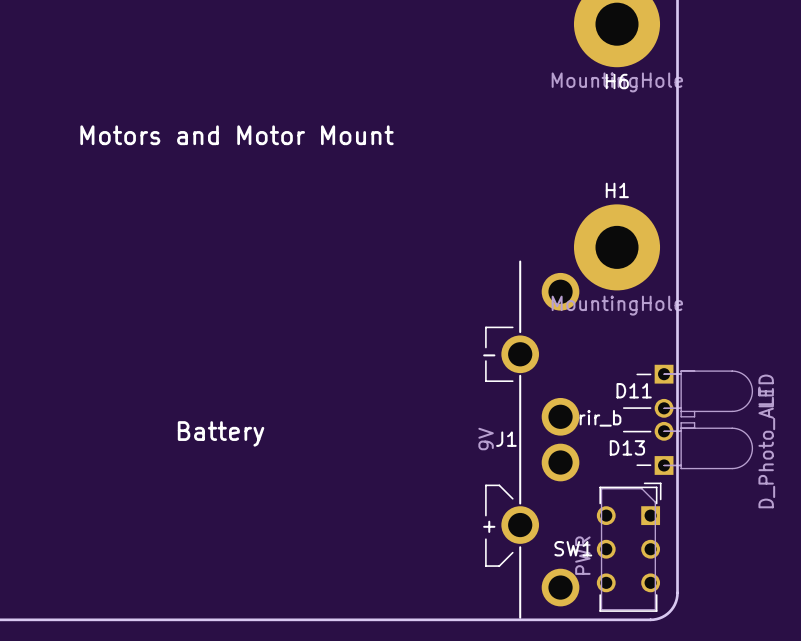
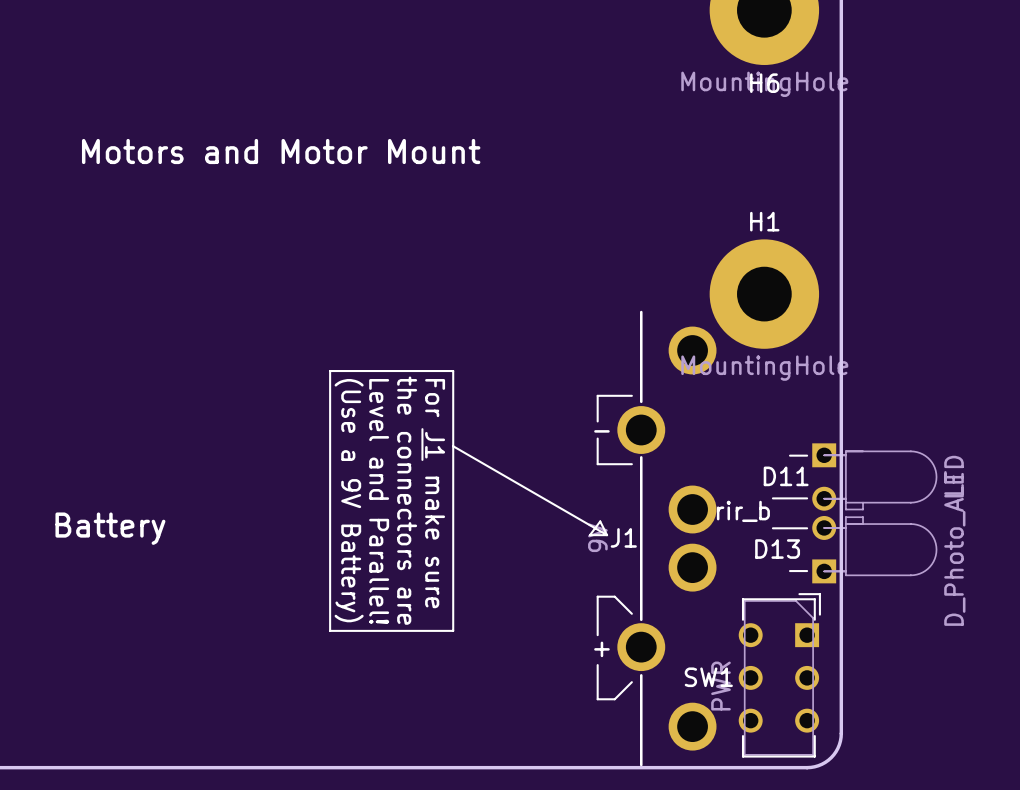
line: none -> (330, 371) (453, 371) (453, 630) (330, 630) (330, 371)
line: none -> (422, 429) (422, 459)
line: none -> (453, 446) (607, 535)
text: none -> For J1 make sure (435, 493)
text: none -> (Use a 9V Battery) (349, 500)
text: none -> the connectors are (407, 500)
text: none -> Level and Parallel! (379, 501)
text position: Battery (221, 433) -> Battery (110, 528)
line: none -> (607, 535) (589, 535) (600, 521) (607, 535)

